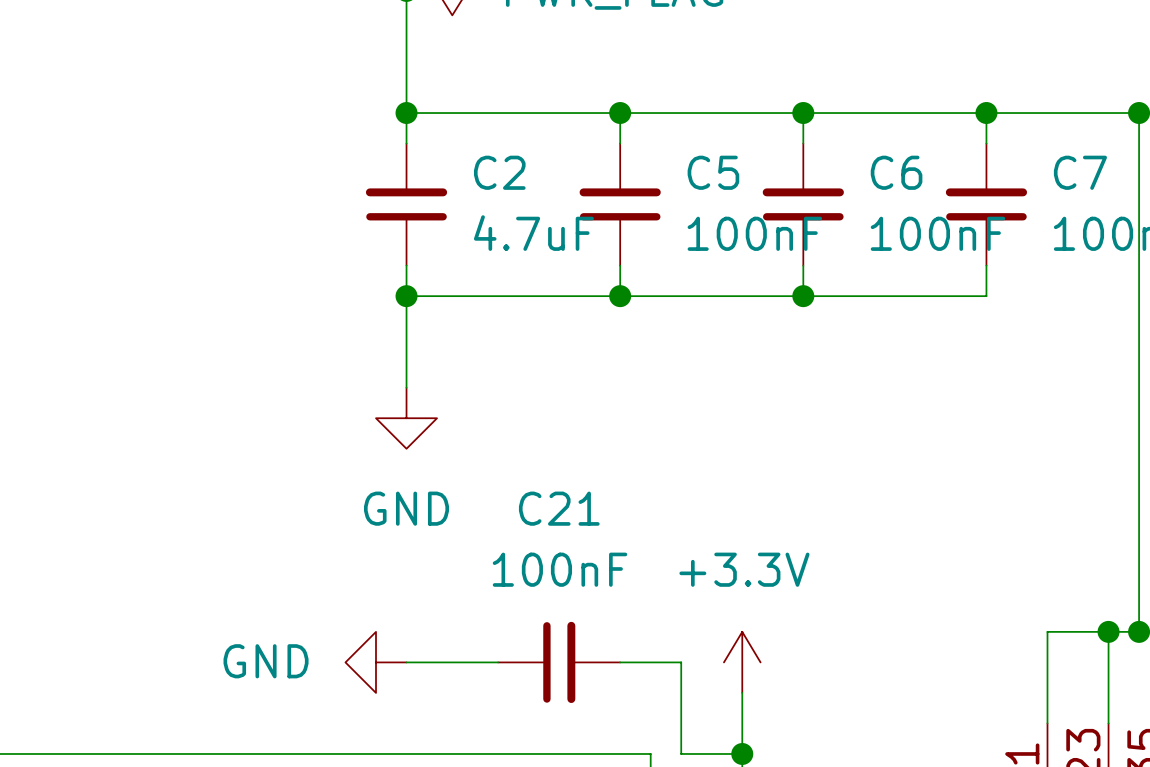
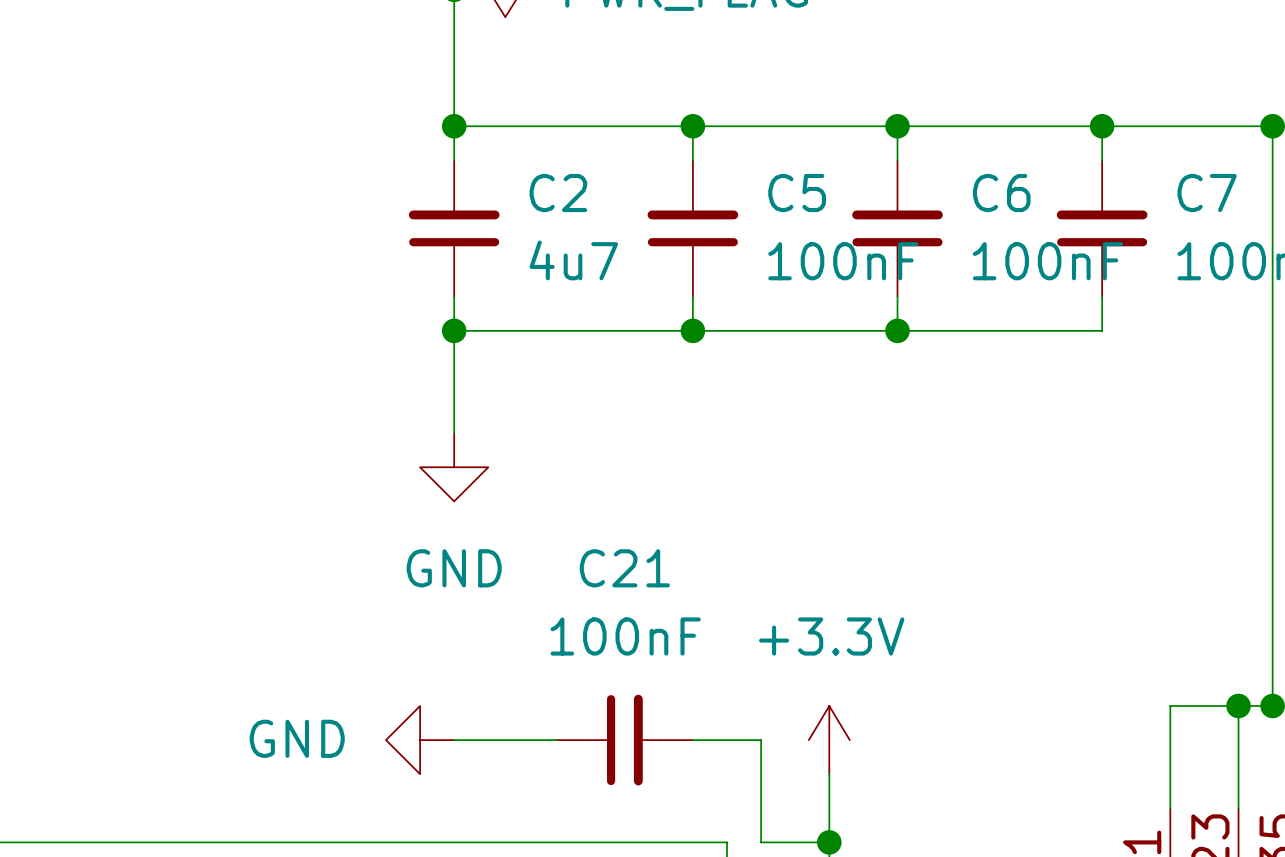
C2 value: 4.7uF (533, 233) -> 4u7 (573, 260)

